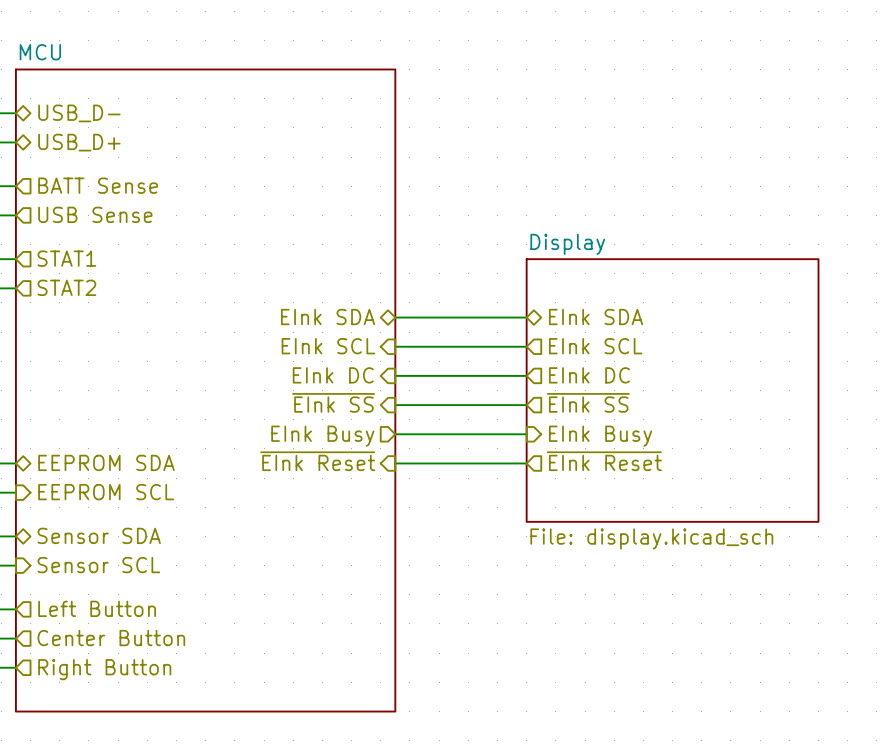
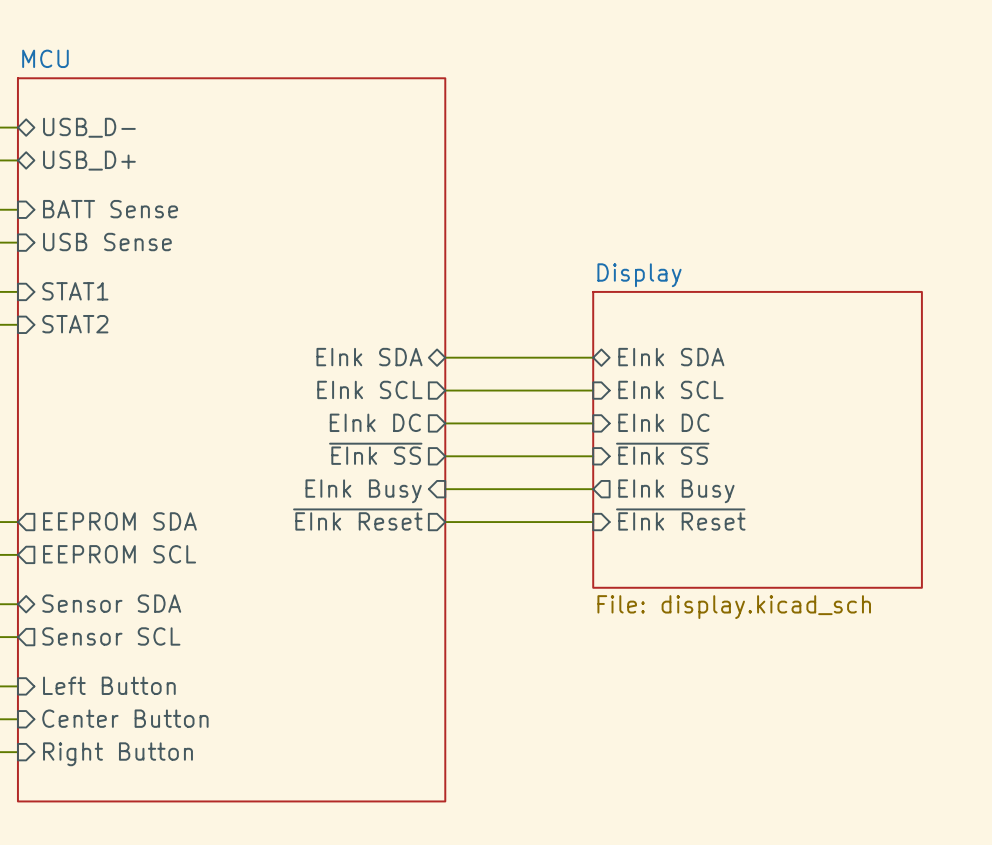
hierarchical label: USB_D- (79, 113) -> none
sheet pin: none -> USB_D- (89, 127)
hierarchical label: USB_D+ (79, 142) -> none
sheet pin: none -> USB_D+ (89, 160)
hierarchical label: BATT Sense (98, 185) -> none
sheet pin: none -> BATT Sense (110, 209)
hierarchical label: USB Sense (95, 214) -> none
sheet pin: none -> USB Sense (107, 242)
hierarchical label: STAT1 (66, 258) -> none
sheet pin: none -> STAT1 (75, 291)
hierarchical label: STAT2 (66, 287) -> none
sheet pin: none -> STAT2 (75, 324)
hierarchical label: EInk SDA (328, 317) -> none
sheet pin: none -> EInk SDA (369, 357)
hierarchical label: EInk SDA (596, 317) -> none
sheet pin: none -> EInk SDA (671, 357)
hierarchical label: EInk SCL (328, 346) -> none
sheet pin: none -> EInk SCL (369, 389)
hierarchical label: EInk SCL (595, 346) -> none
sheet pin: none -> EInk SCL (670, 389)
hierarchical label: EInk DC (333, 375) -> none
sheet pin: none -> EInk DC (375, 422)
hierarchical label: EInk DC (589, 375) -> none
sheet pin: none -> EInk DC (663, 422)
hierarchical label: ~{EInk SS} (333, 402) -> none
sheet pin: none -> ~{EInk SS} (375, 453)
hierarchical label: ~{EInk SS} (588, 402) -> none
sheet pin: none -> ~{EInk SS} (662, 453)
hierarchical label: EInk Busy (322, 436) -> none
sheet pin: none -> EInk Busy (363, 491)
hierarchical label: EInk Busy (600, 436) -> none
sheet pin: none -> EInk Busy (676, 491)
hierarchical label: ~{EInk Reset} (317, 461) -> none
sheet pin: none -> ~{EInk Reset} (357, 519)
hierarchical label: ~{EInk Reset} (604, 461) -> none
sheet pin: none -> ~{EInk Reset} (680, 519)
hierarchical label: EEPROM SDA (106, 462) -> none
sheet pin: none -> EEPROM SDA (119, 521)
hierarchical label: EEPROM SCL (106, 492) -> none
sheet pin: none -> EEPROM SCL (119, 554)
hierarchical label: Sensor SDA (99, 535) -> none
sheet pin: none -> Sensor SDA (111, 603)
hierarchical label: Sensor SCL (98, 565) -> none
sheet pin: none -> Sensor SCL (111, 636)
hierarchical label: Left Button (97, 608) -> none
sheet pin: none -> Left Button (109, 685)
hierarchical label: Center Button (111, 638) -> none
sheet pin: none -> Center Button (125, 718)
hierarchical label: Right Button (104, 669) -> none
sheet pin: none -> Right Button (117, 754)

